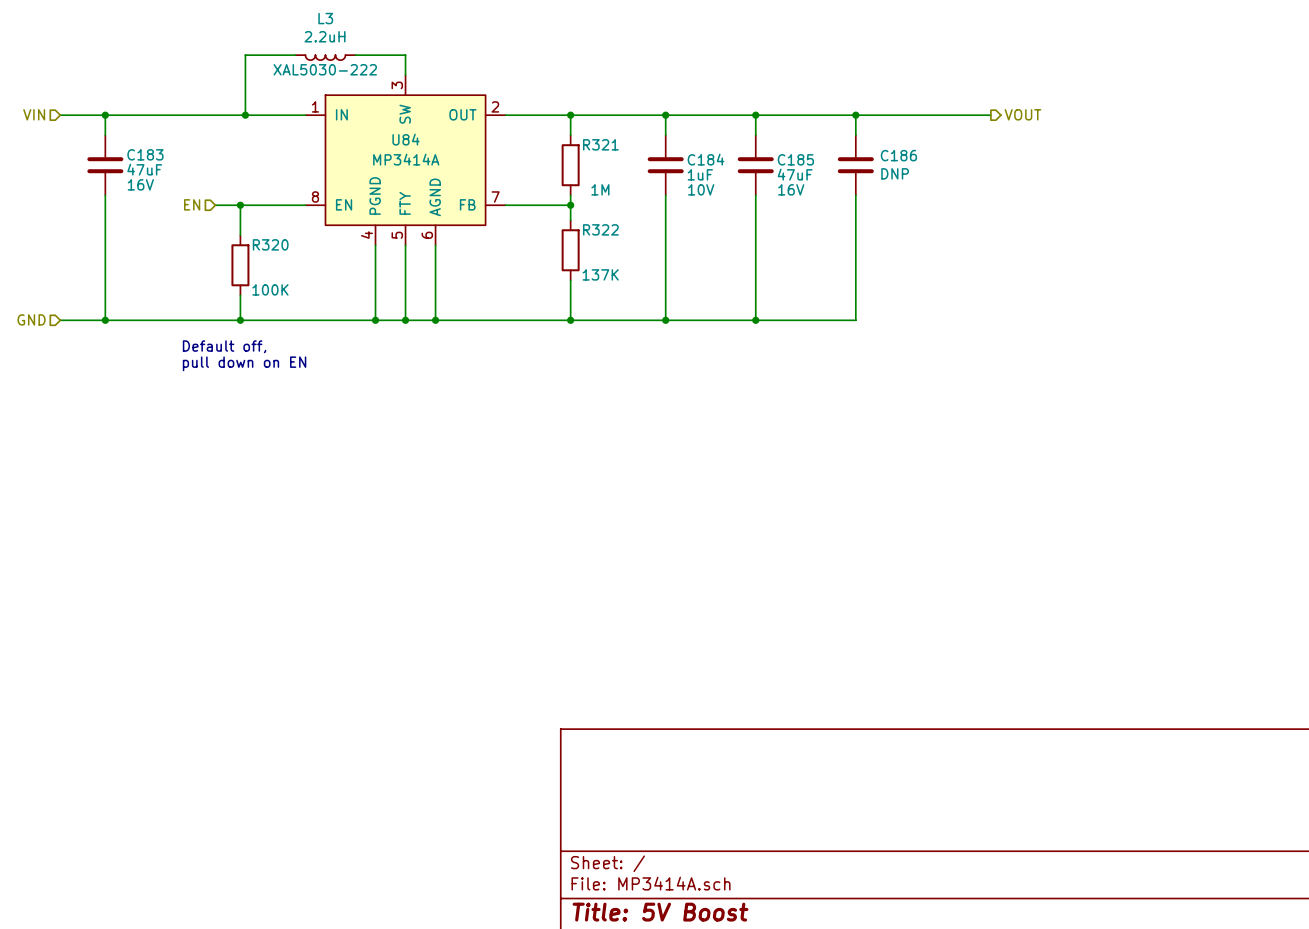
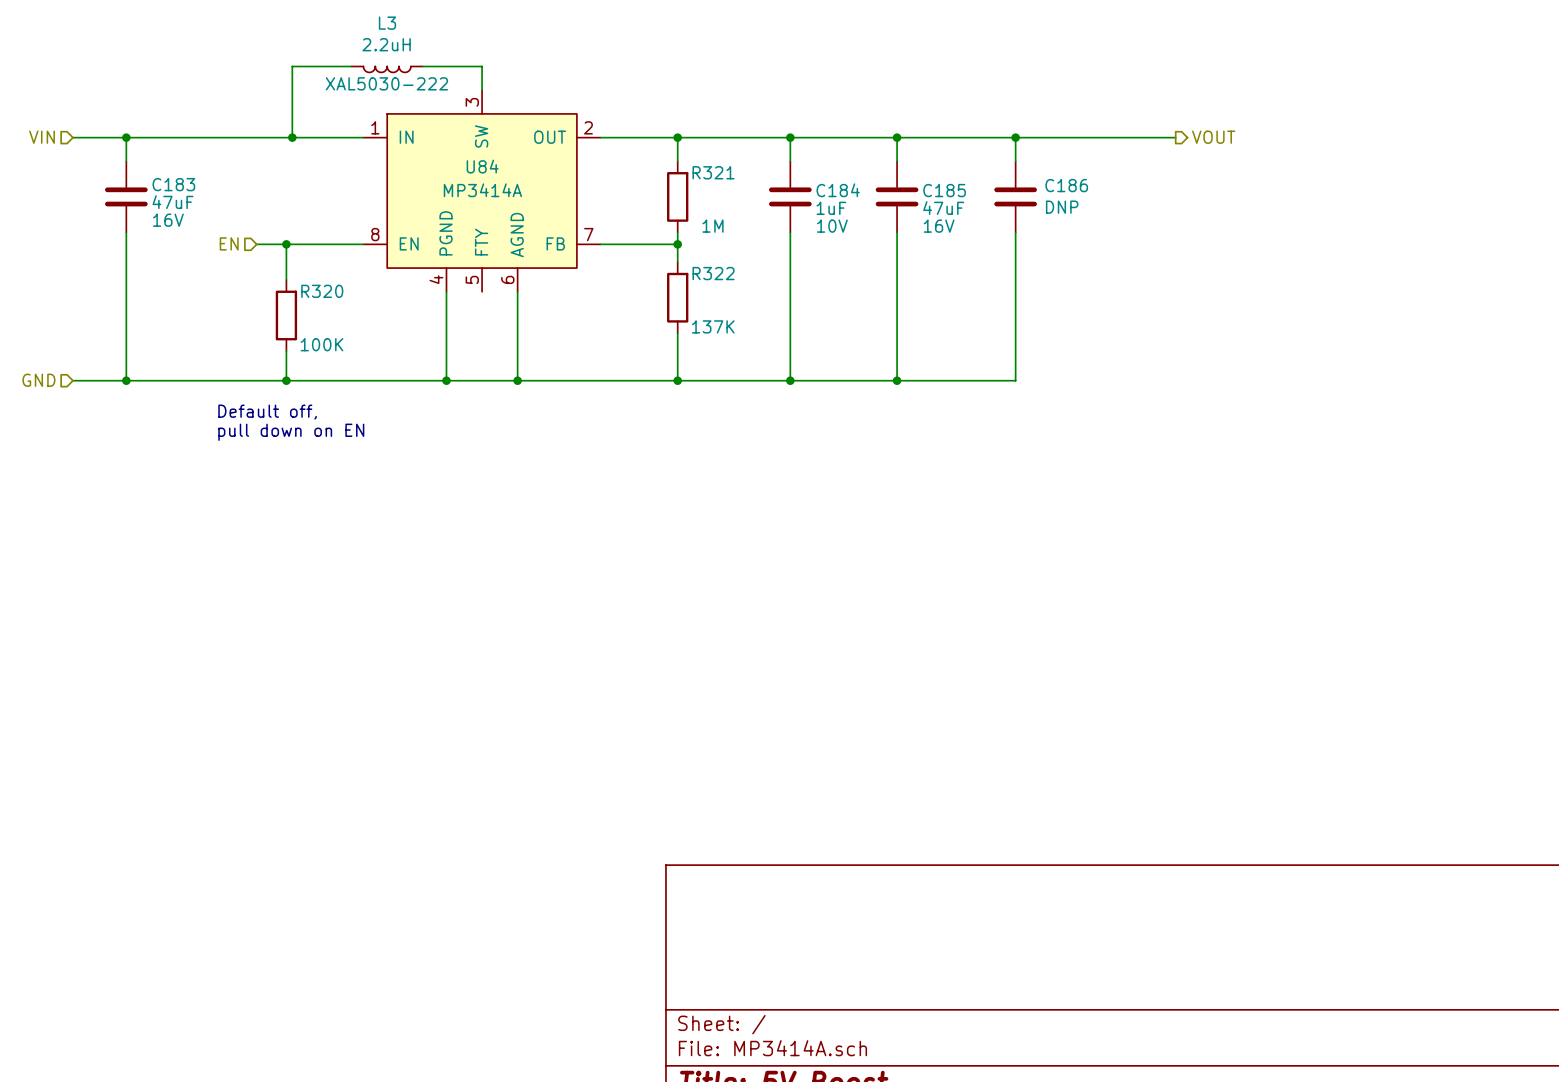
wire: (405, 245) (405, 320) -> none
junction: (405, 320) -> none

